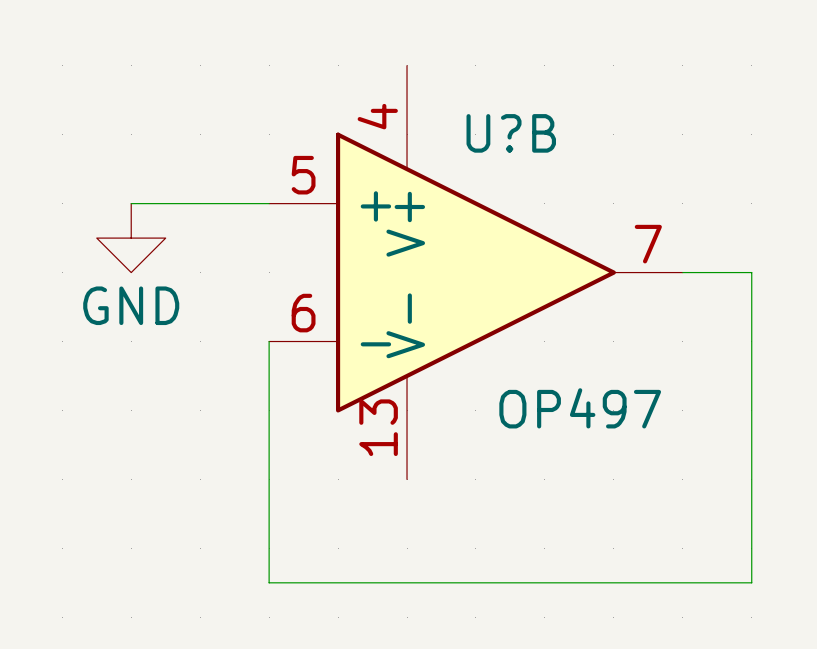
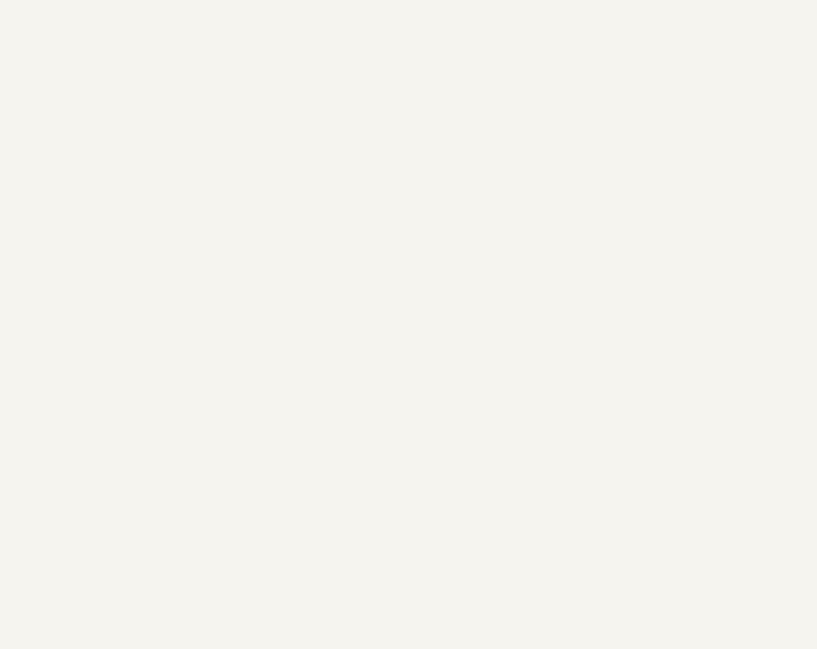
wire: (131, 203) (269, 203) -> none
power symbol: GND (131, 238) -> none
U?B: OP497 (475, 272) -> none
wire: (682, 272) (751, 272) (751, 582) (269, 582) (269, 341) -> none

